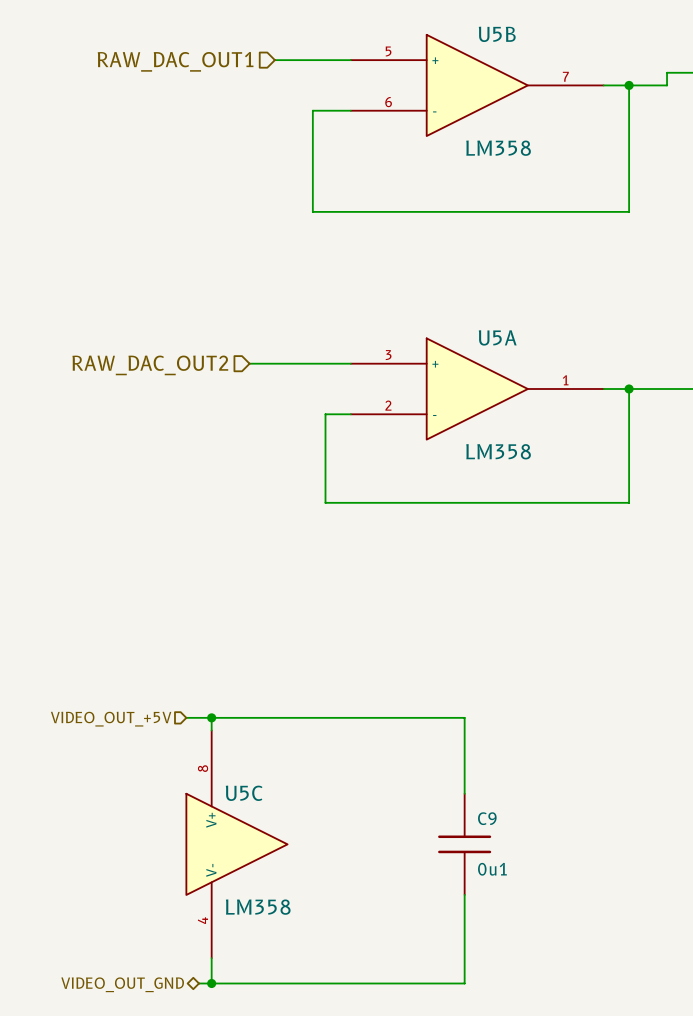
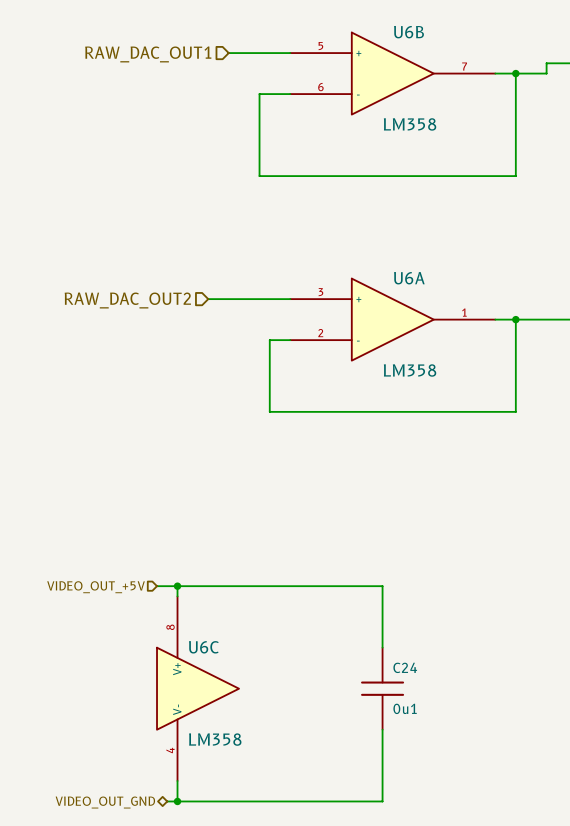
U5B name: U5B (497, 34) -> U6B (408, 32)
U5A name: U5A (497, 337) -> U6A (409, 278)
U5C name: U5C (244, 793) -> U6C (203, 647)
C9 name: C9 (487, 818) -> C24 (405, 667)

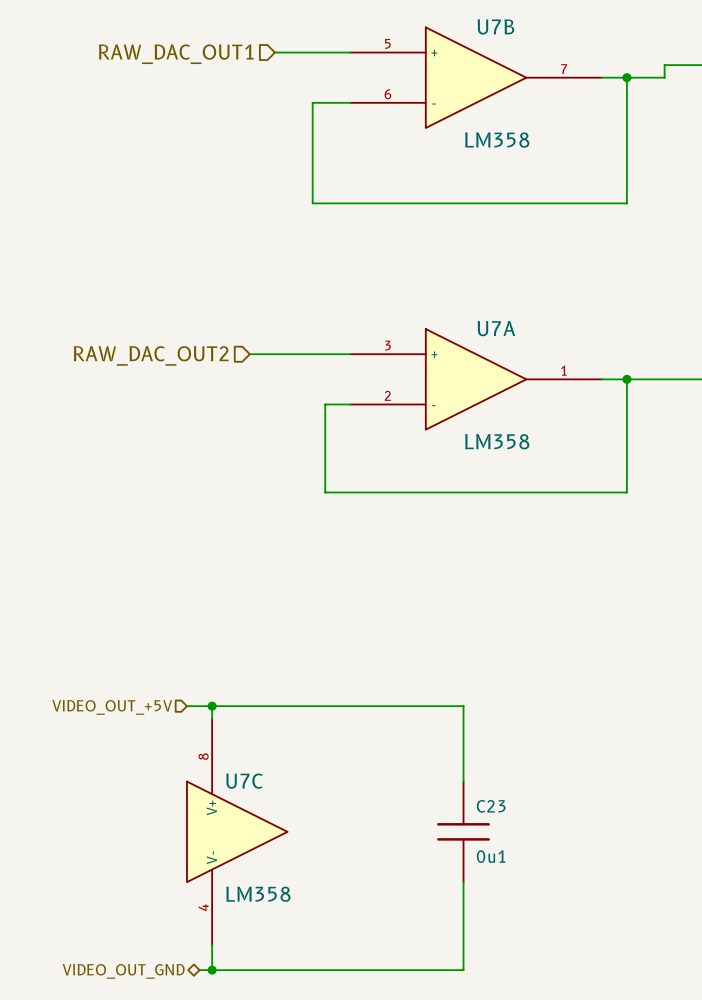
U6B name: U6B (408, 32) -> U7B (495, 26)
U6A name: U6A (409, 278) -> U7A (496, 328)
U6C name: U6C (203, 647) -> U7C (244, 781)
C24 name: C24 (405, 667) -> C23 (491, 806)

